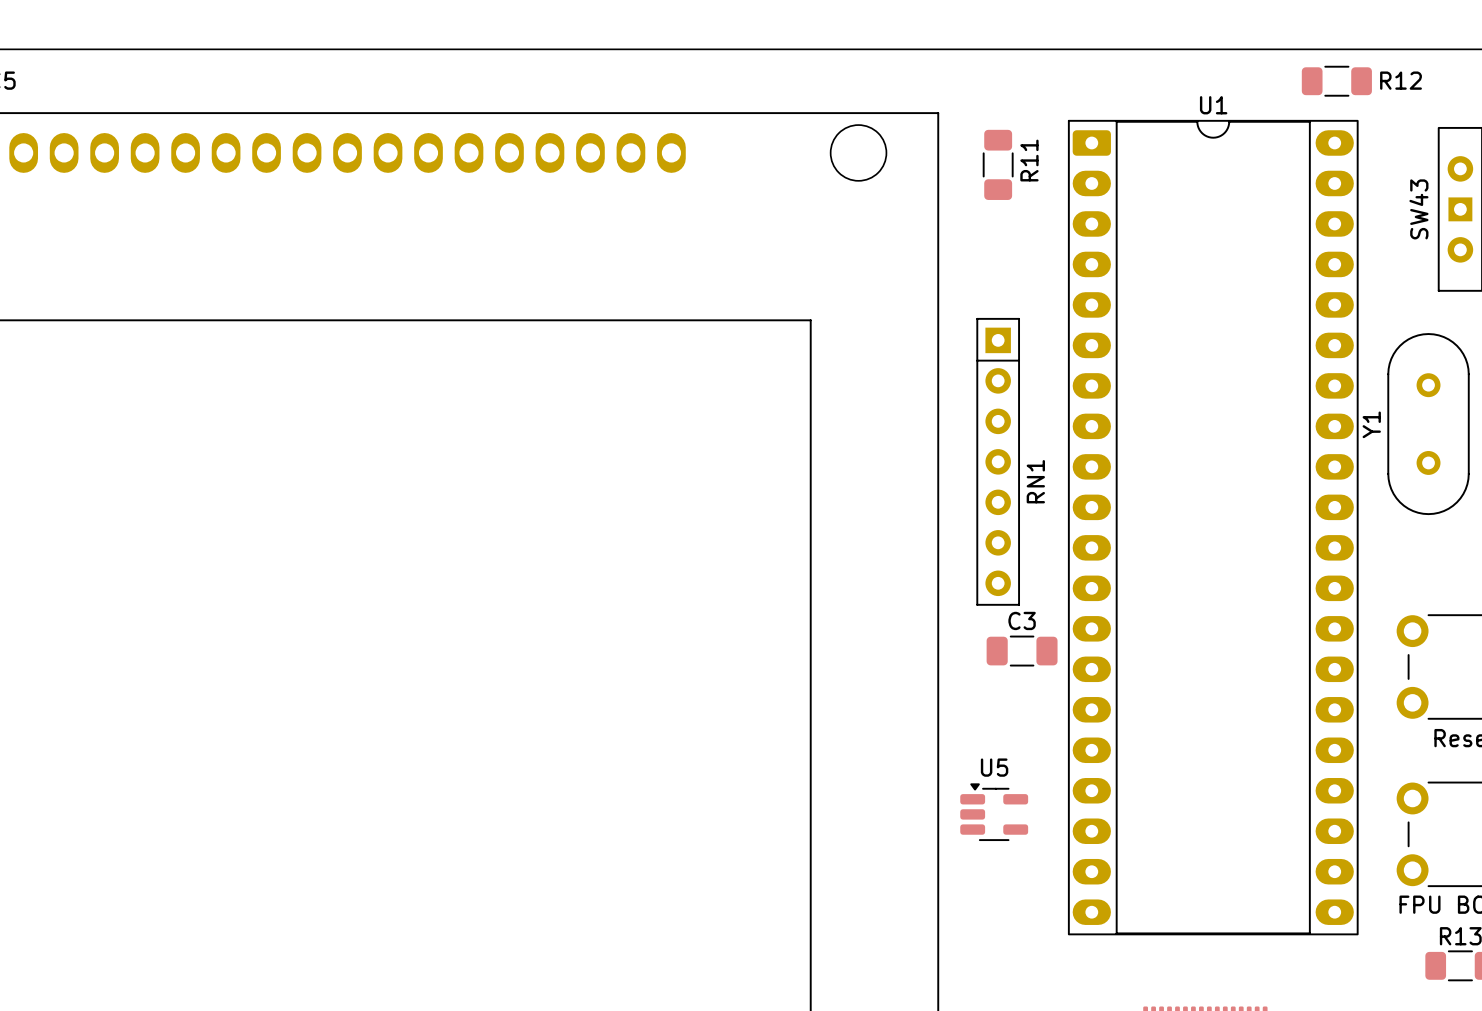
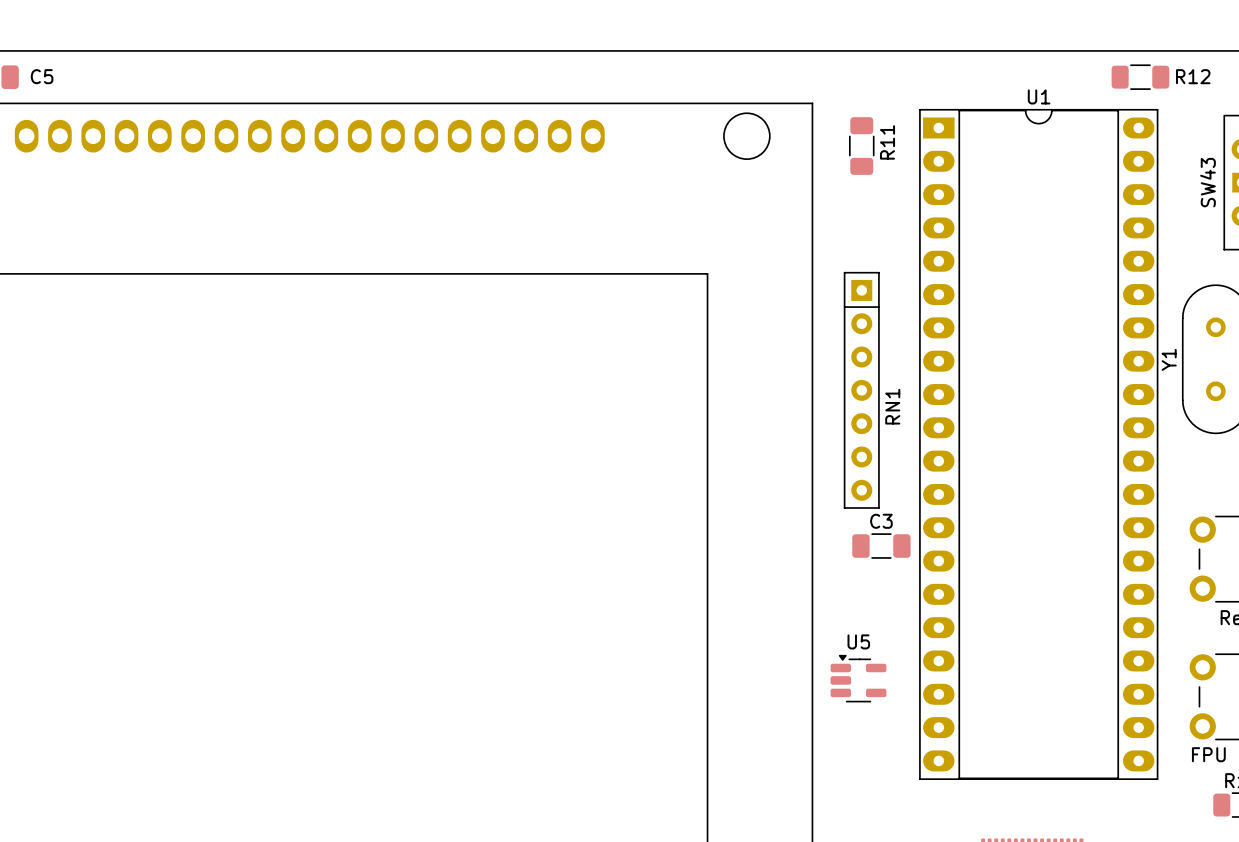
U1 footprint: [1067, 119, 1359, 936] -> [919, 108, 1159, 780]

